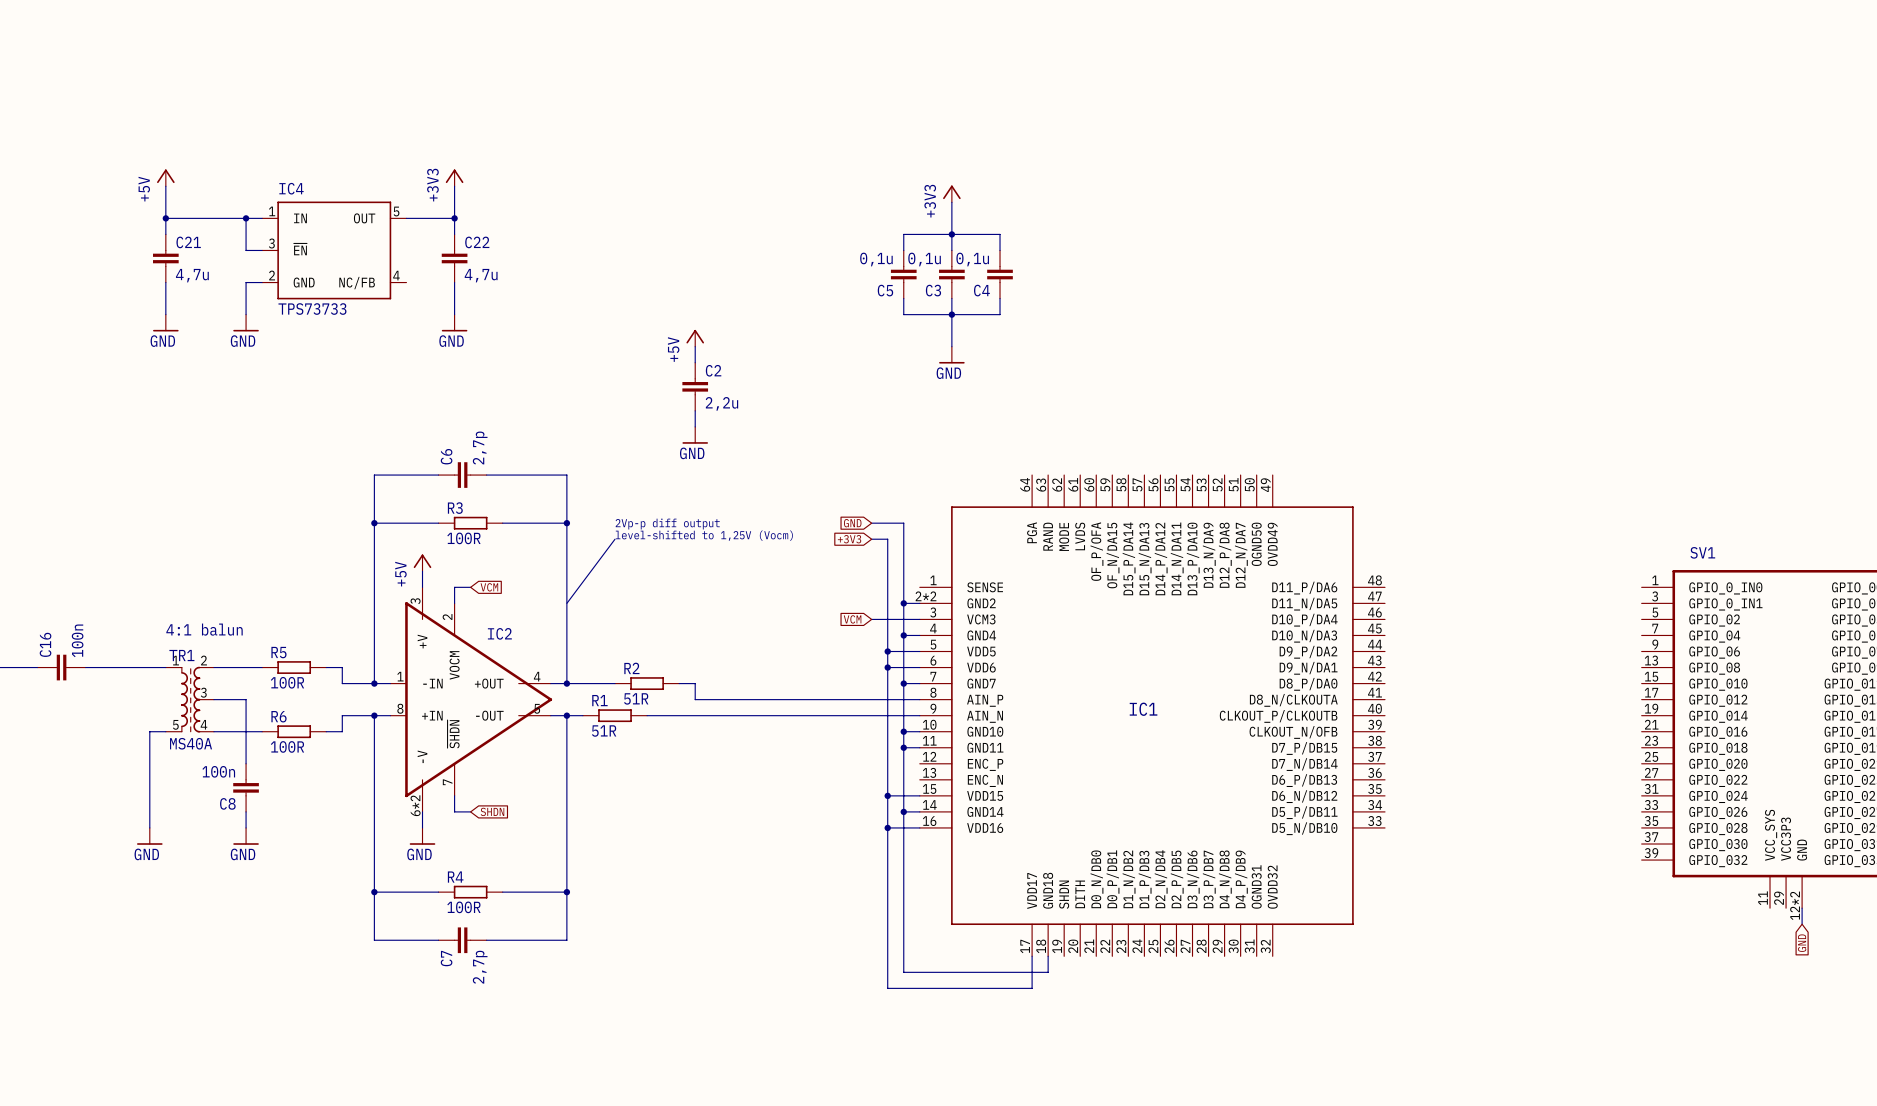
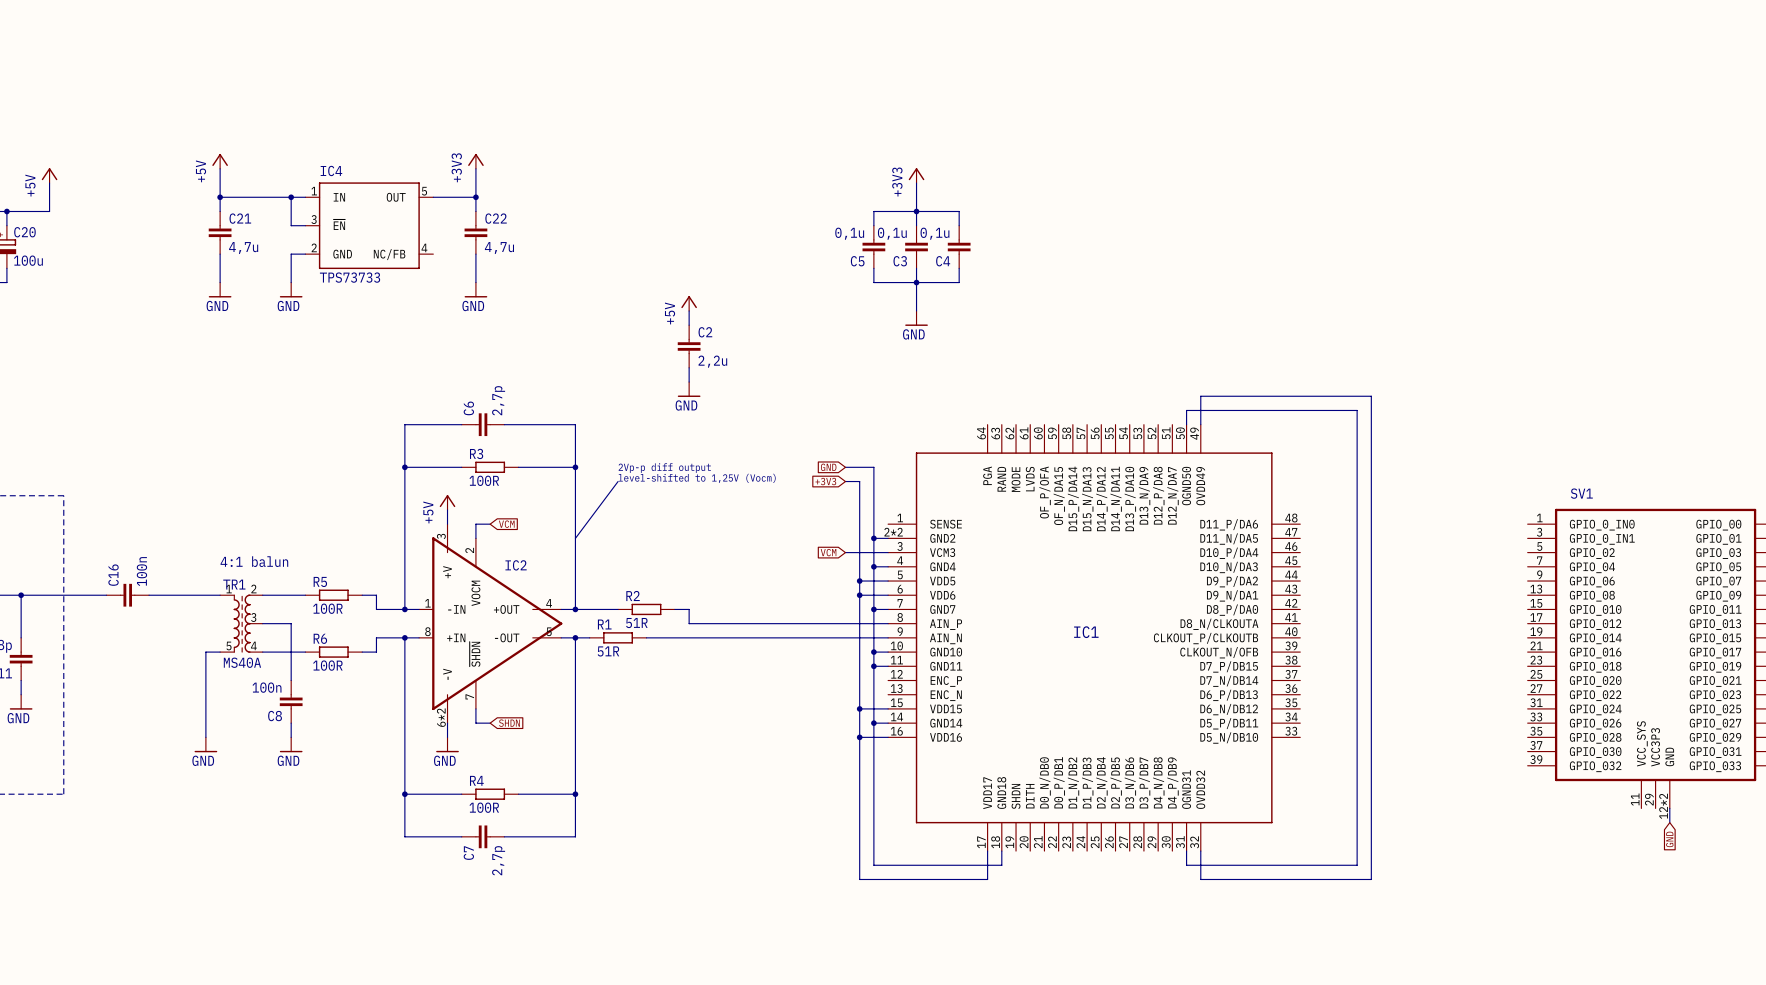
wire: none -> (1186, 424) (1186, 410) (1357, 410) (1357, 865) (1186, 865) (1186, 851)
wire: none -> (1200, 424) (1200, 396) (1371, 396) (1371, 879) (1200, 879) (1200, 851)

